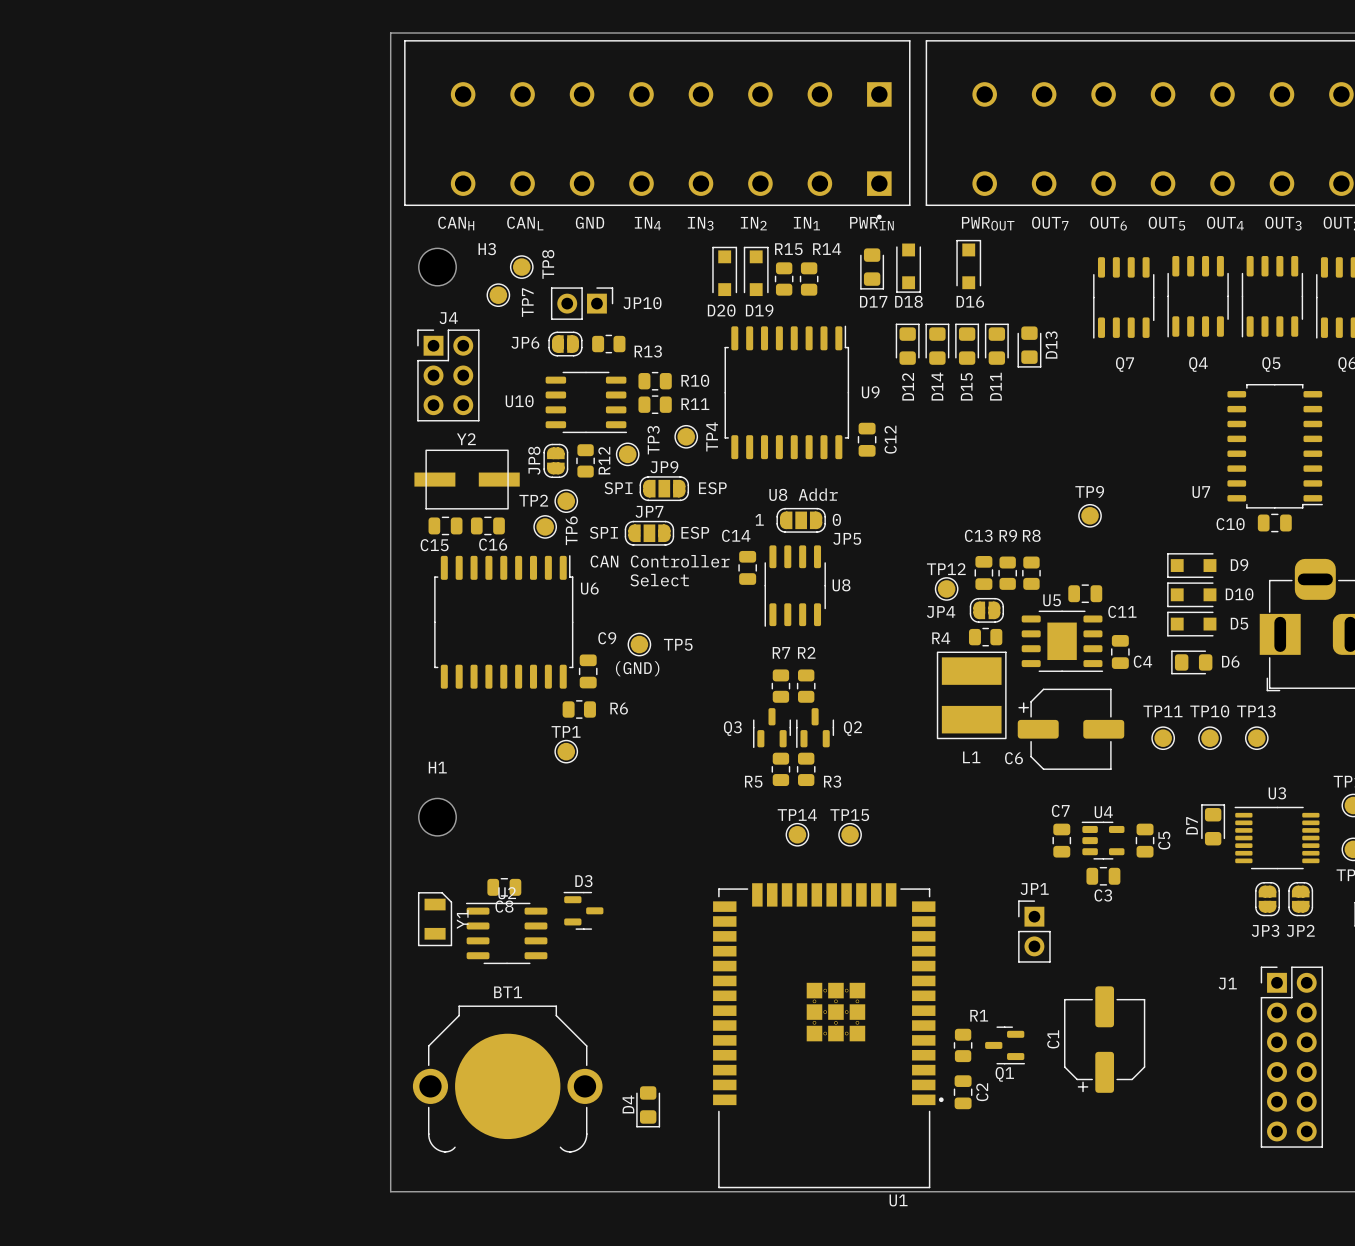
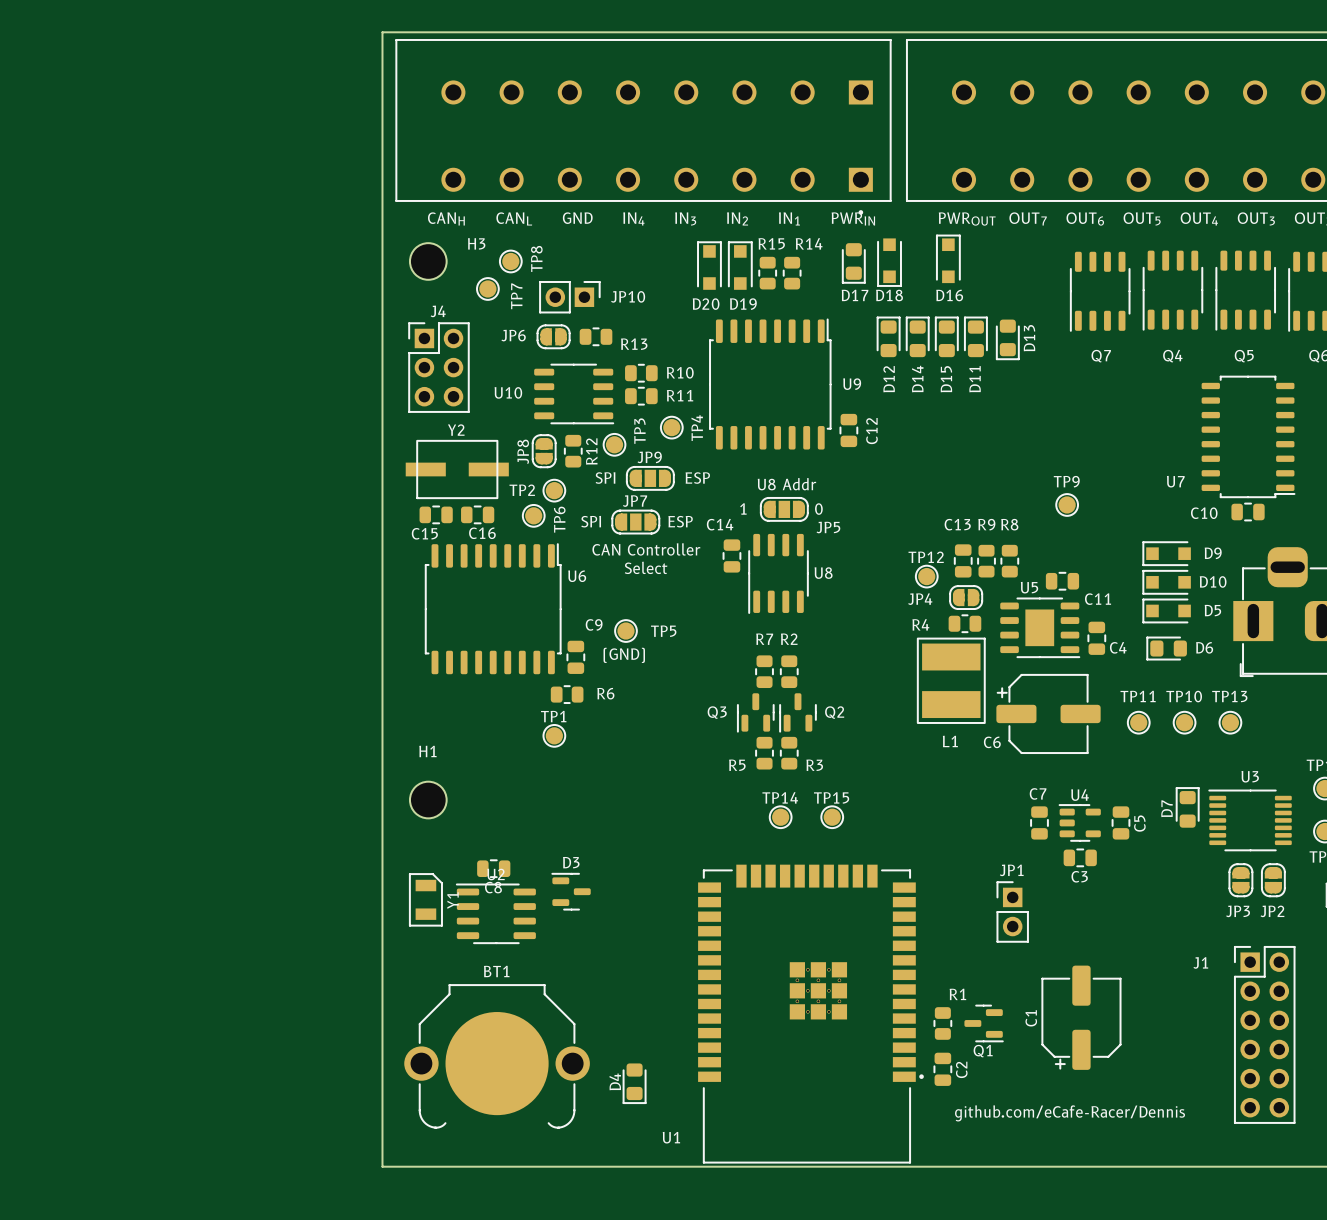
text: none -> github.com/eCafe-Racer/Dennis (1070, 1113)
U1 name position: U1 (898, 1200) -> U1 (671, 1137)

